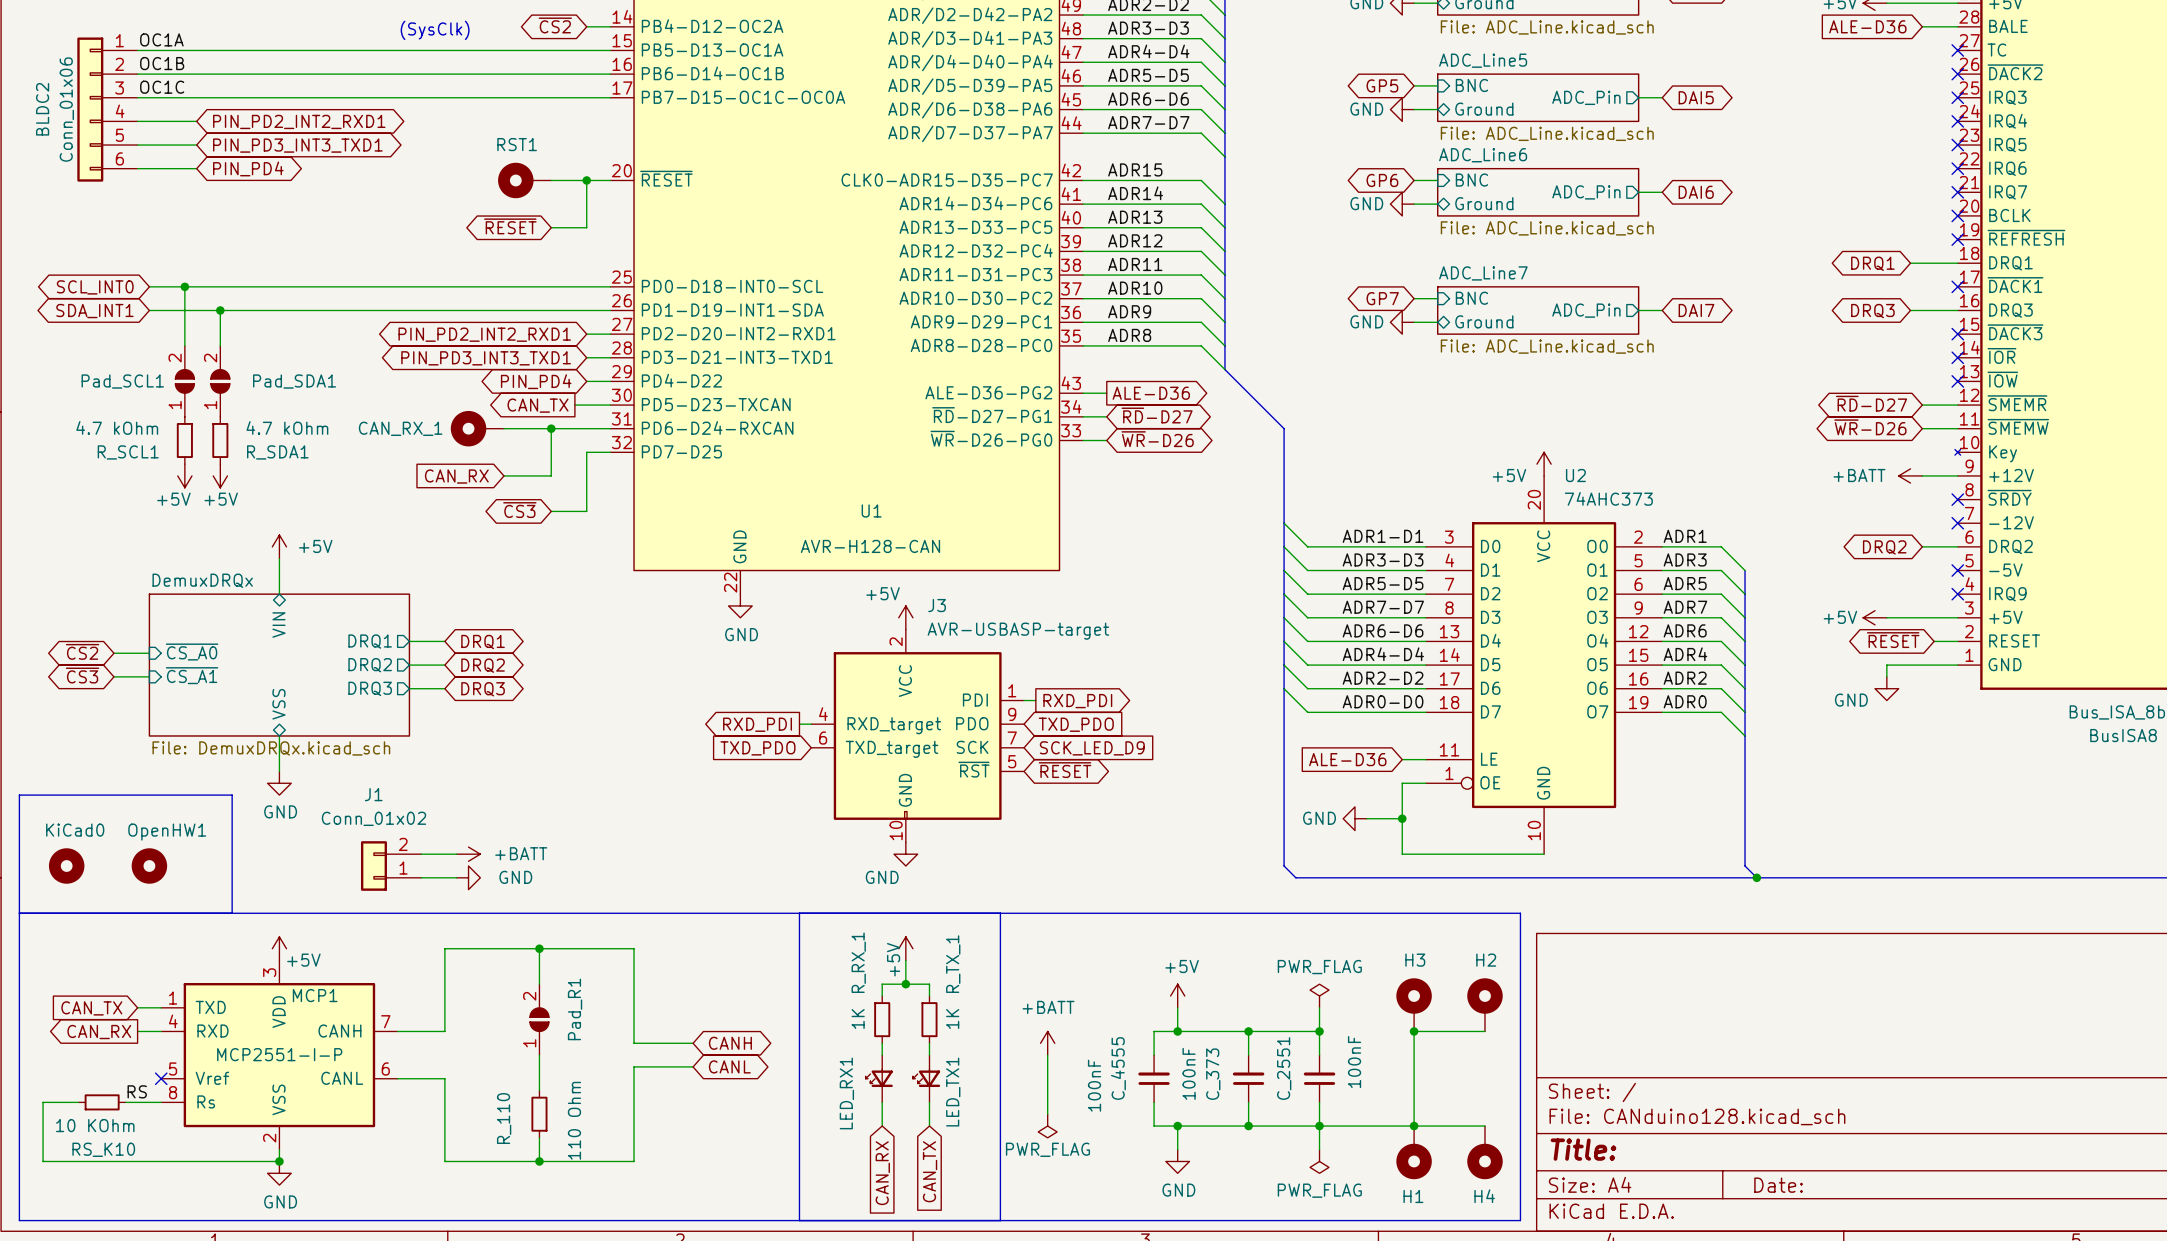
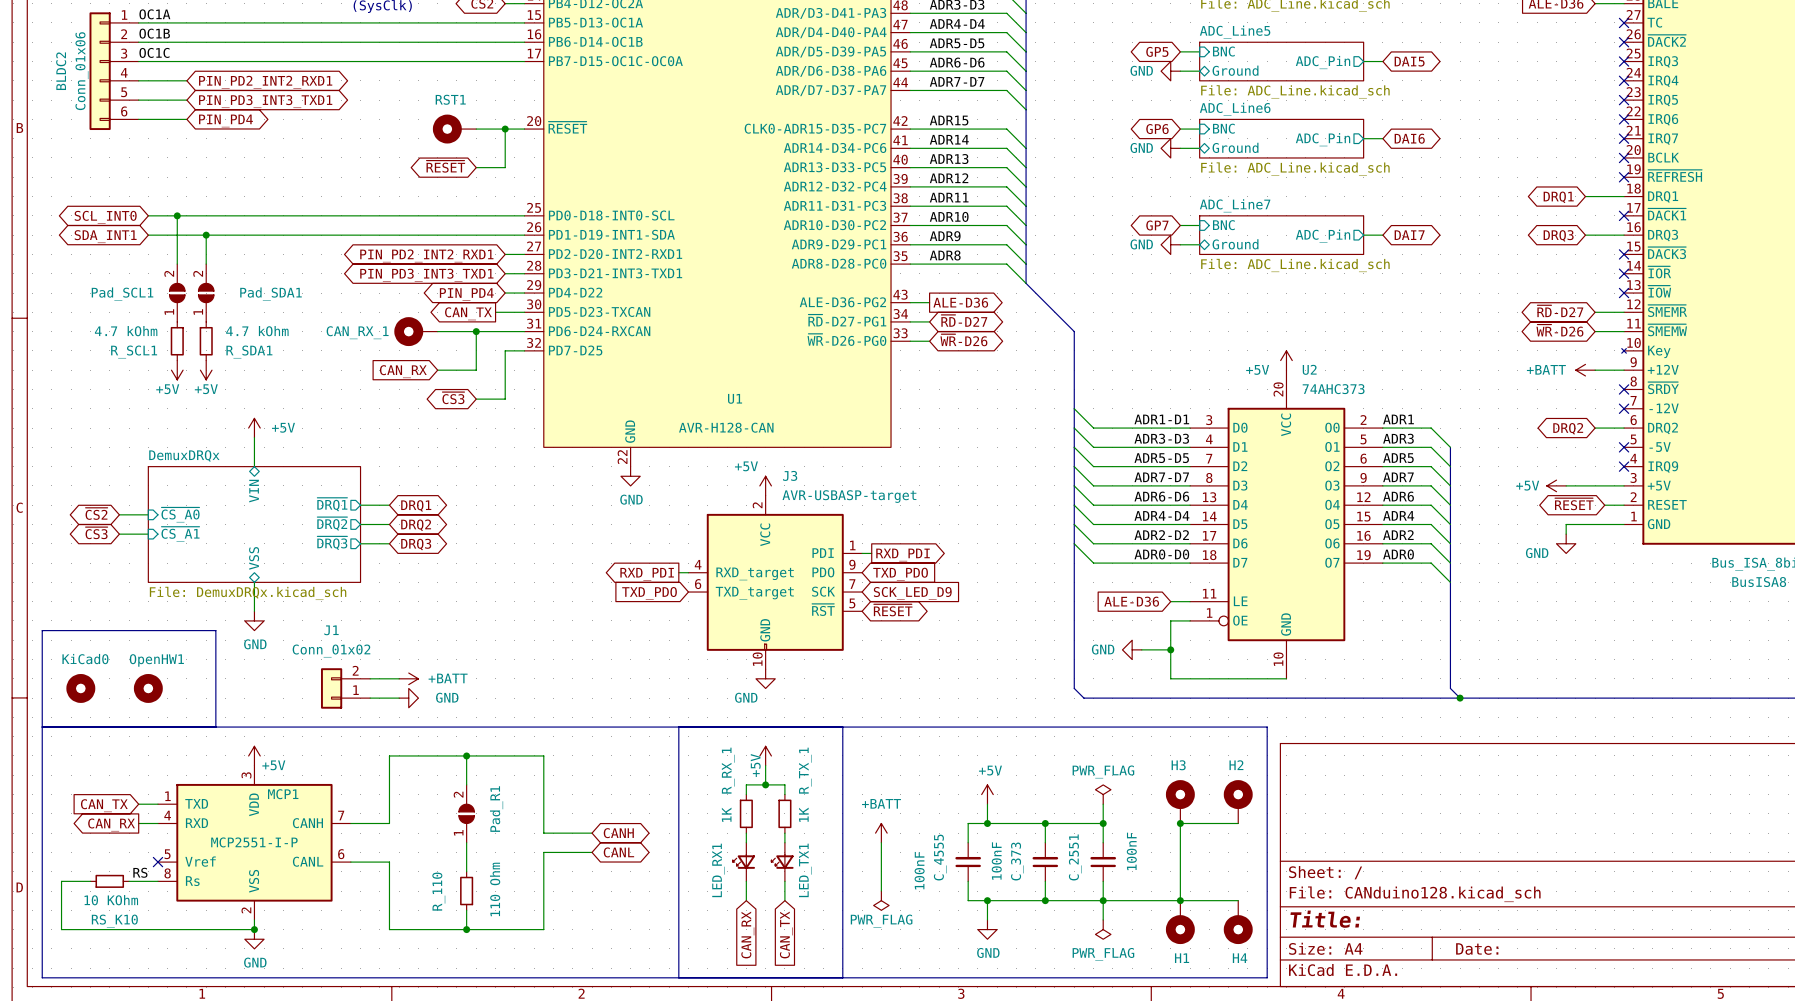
sheet pin: DRQ1 (370, 641) -> ~{DRQ1} (332, 504)
sheet pin: DRQ2 (370, 665) -> ~{DRQ2} (332, 523)
sheet pin: DRQ3 (370, 688) -> ~{DRQ3} (332, 543)

